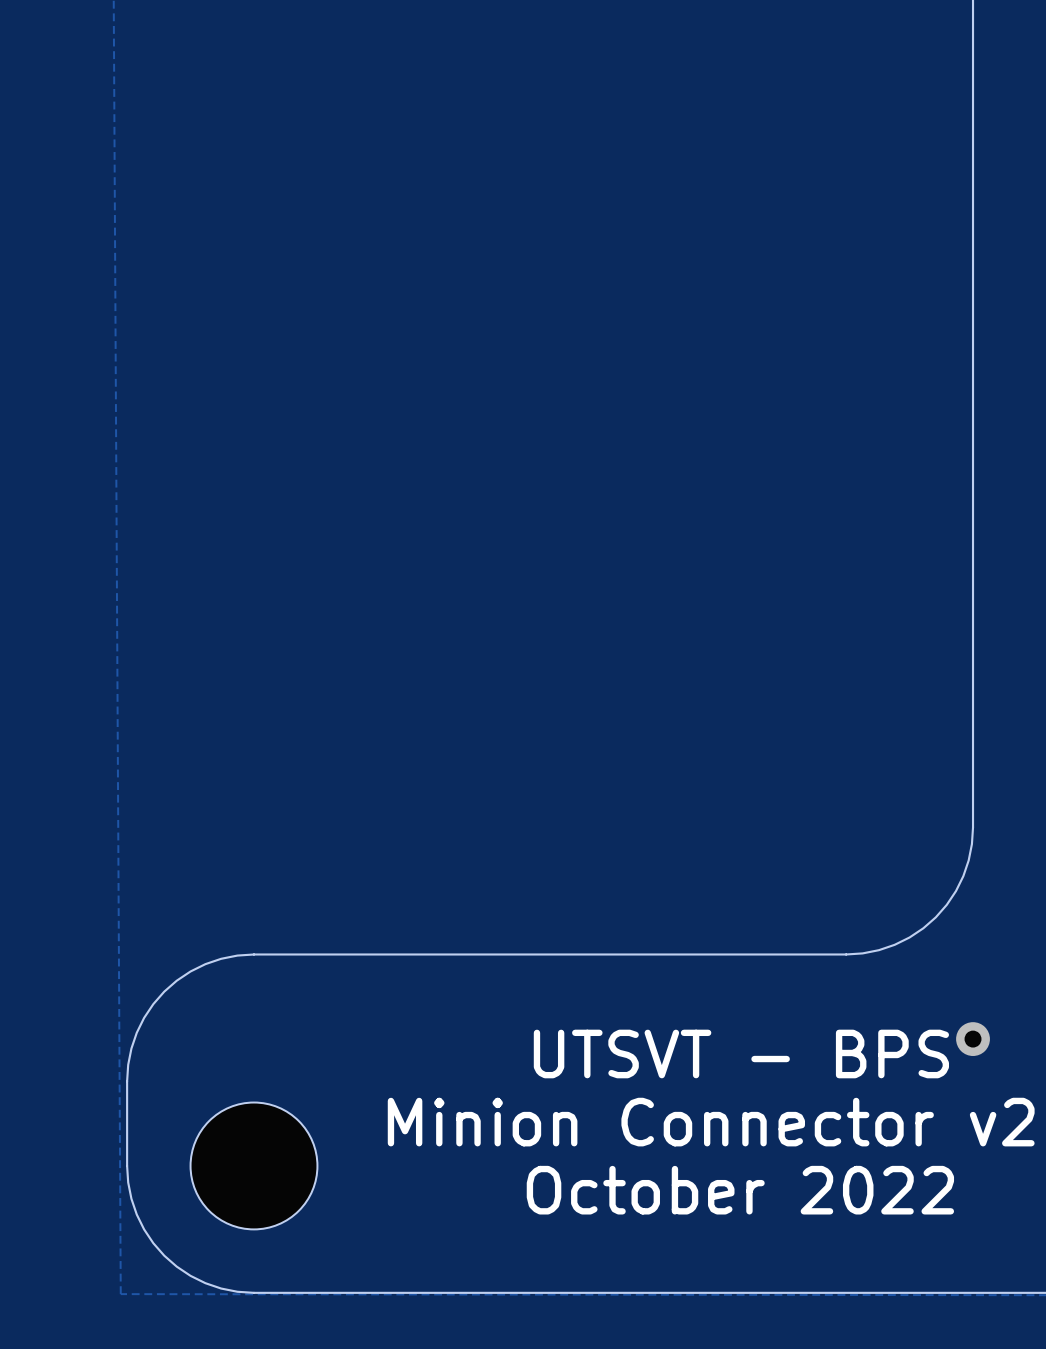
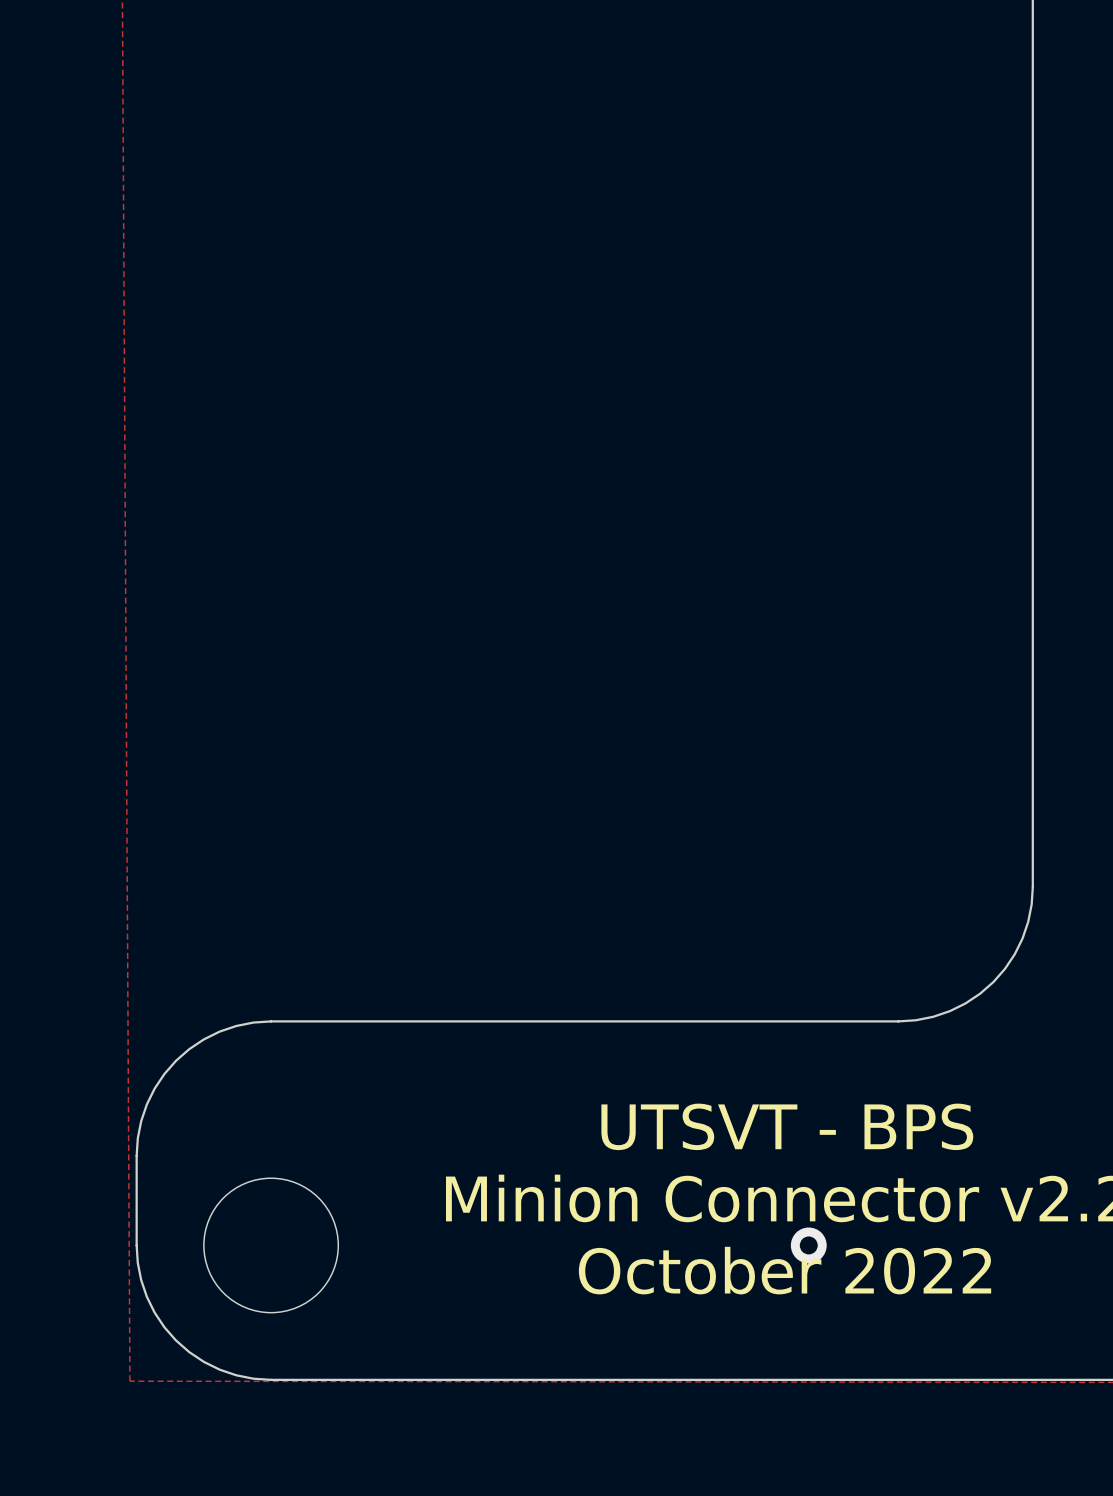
via position: (973, 1039) -> (808, 1245)

